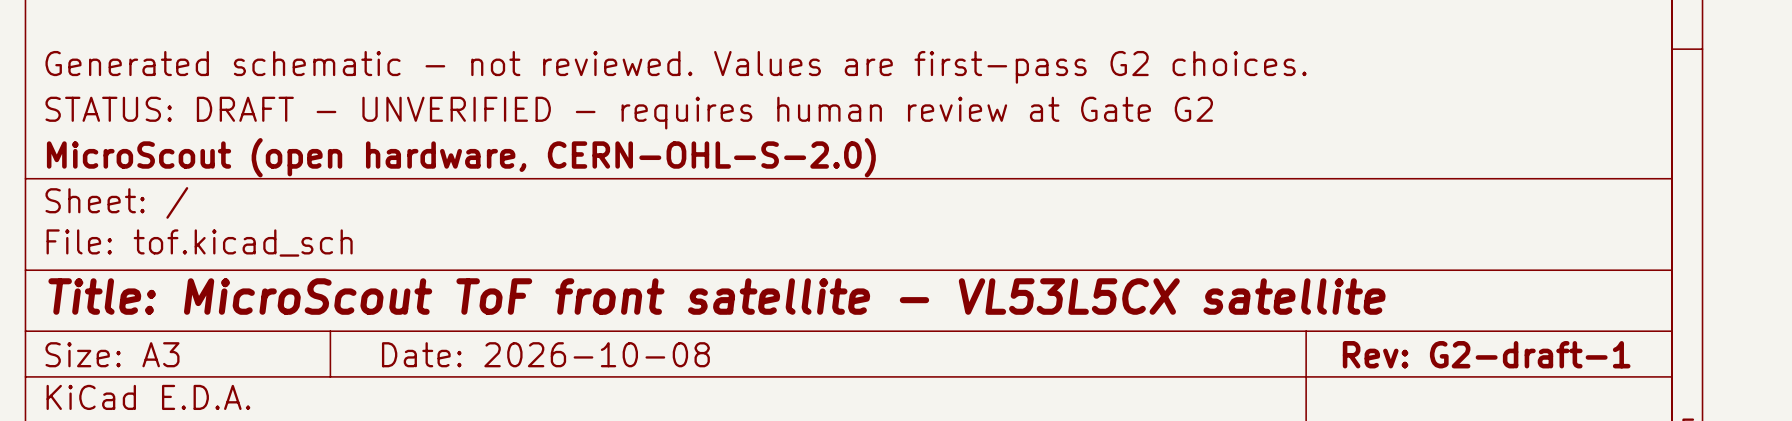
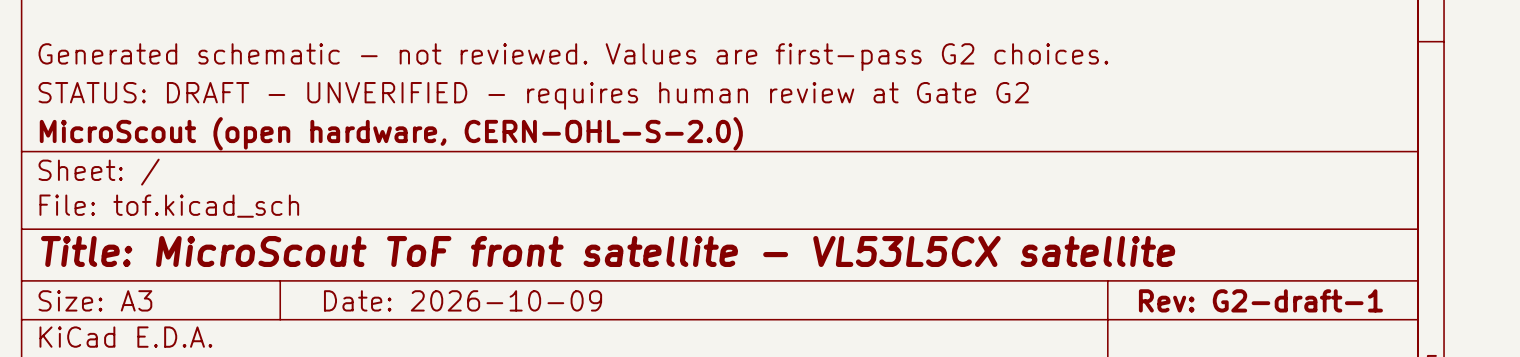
title block: Date: 2026-10-08 (545, 354) -> Date: 2026-10-09 (463, 300)

